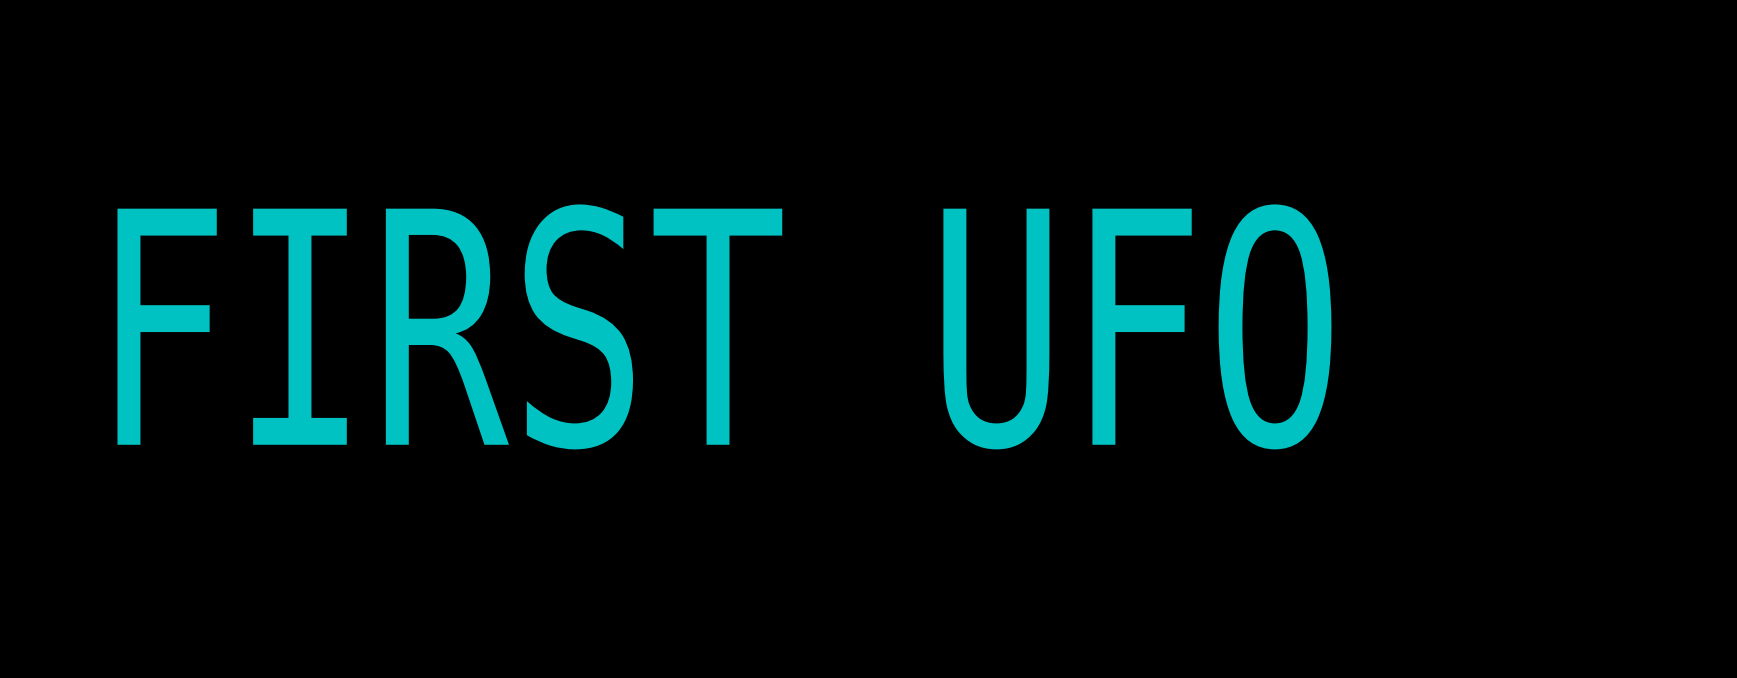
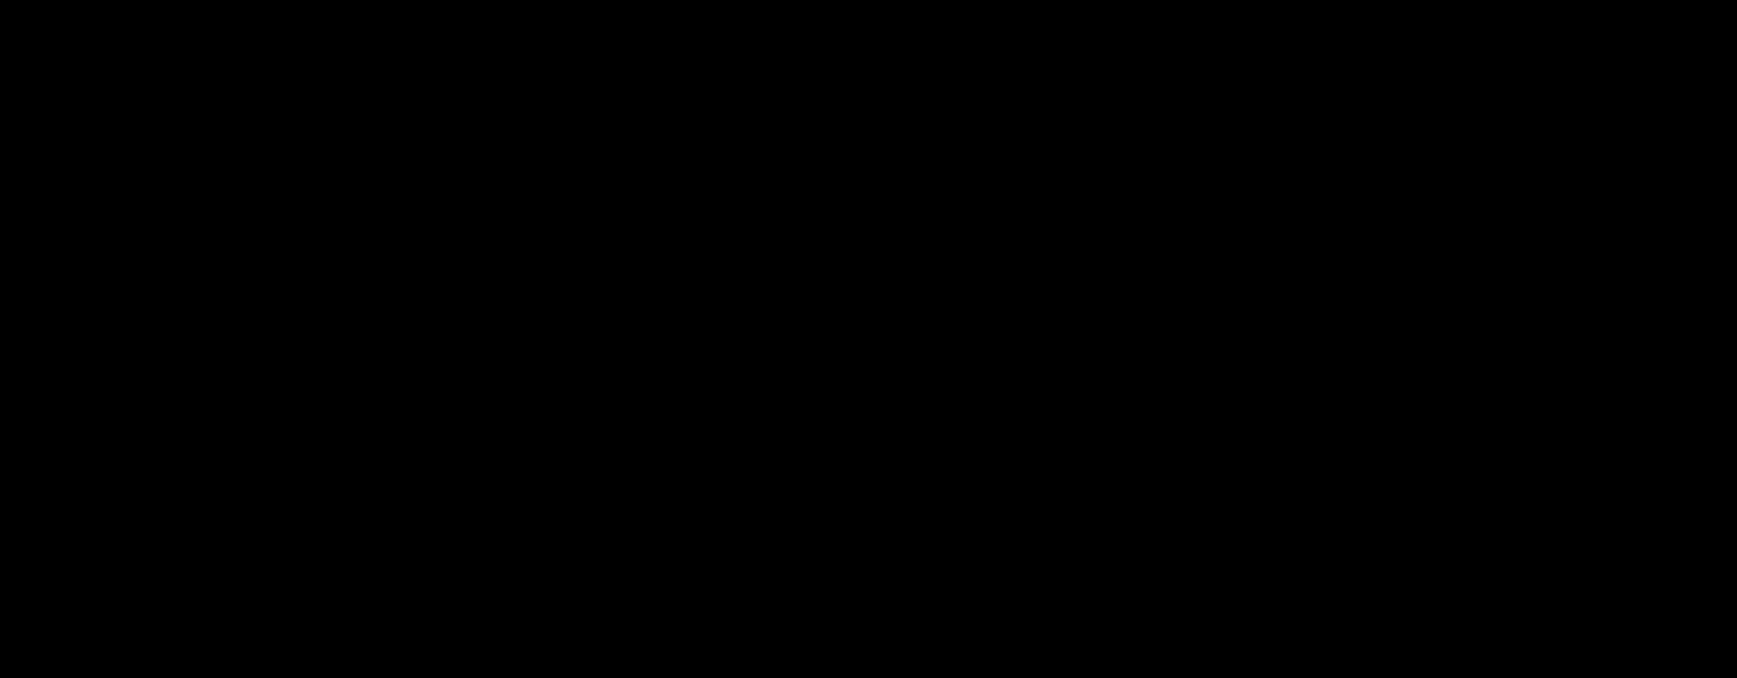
text: FIRST UFO (724, 326) -> none

